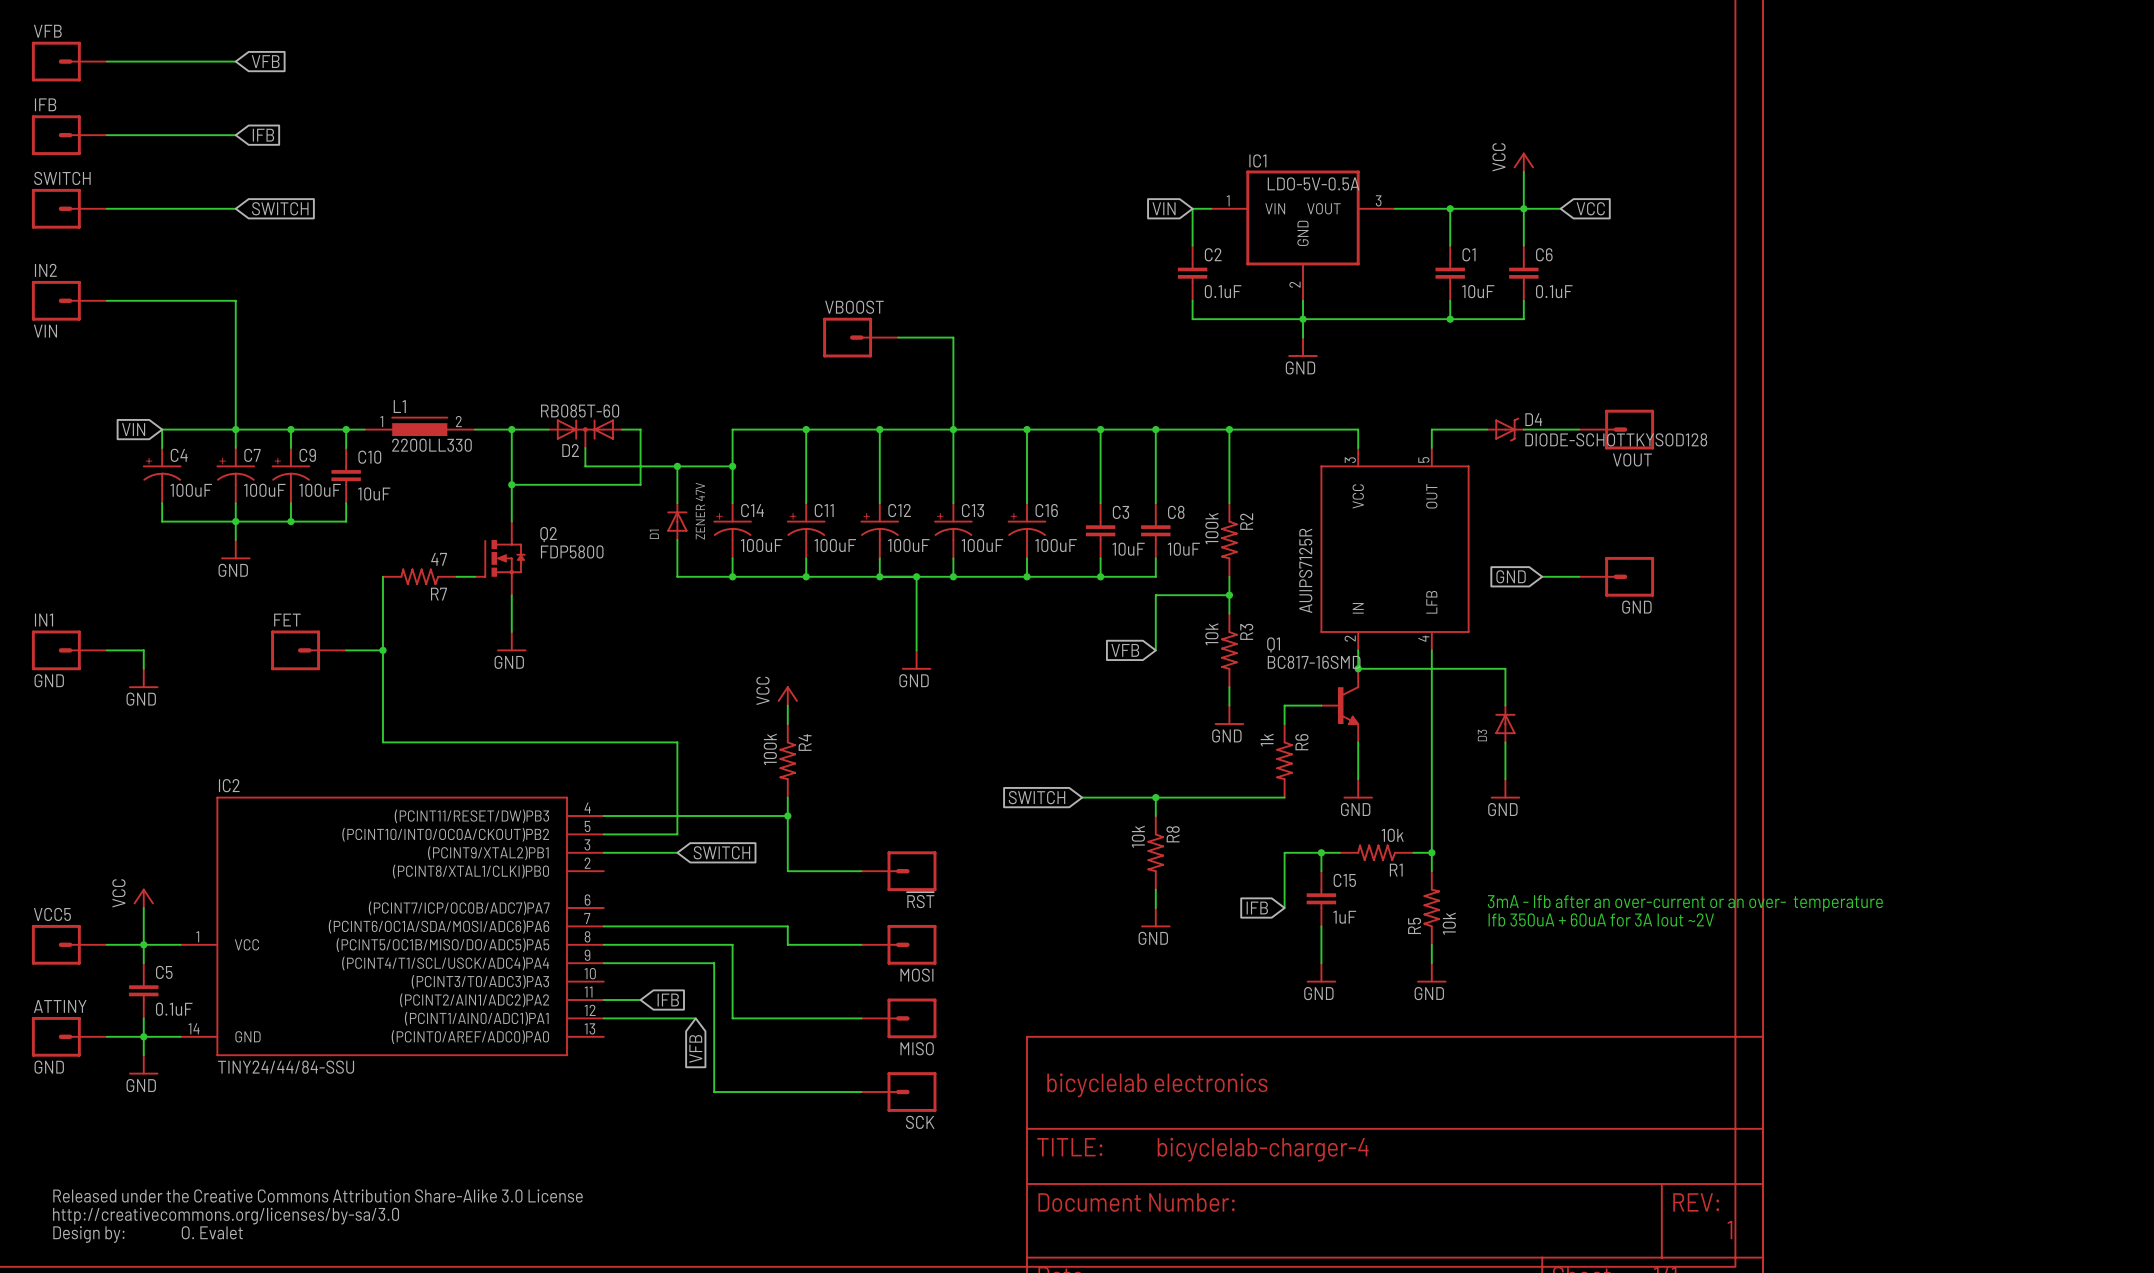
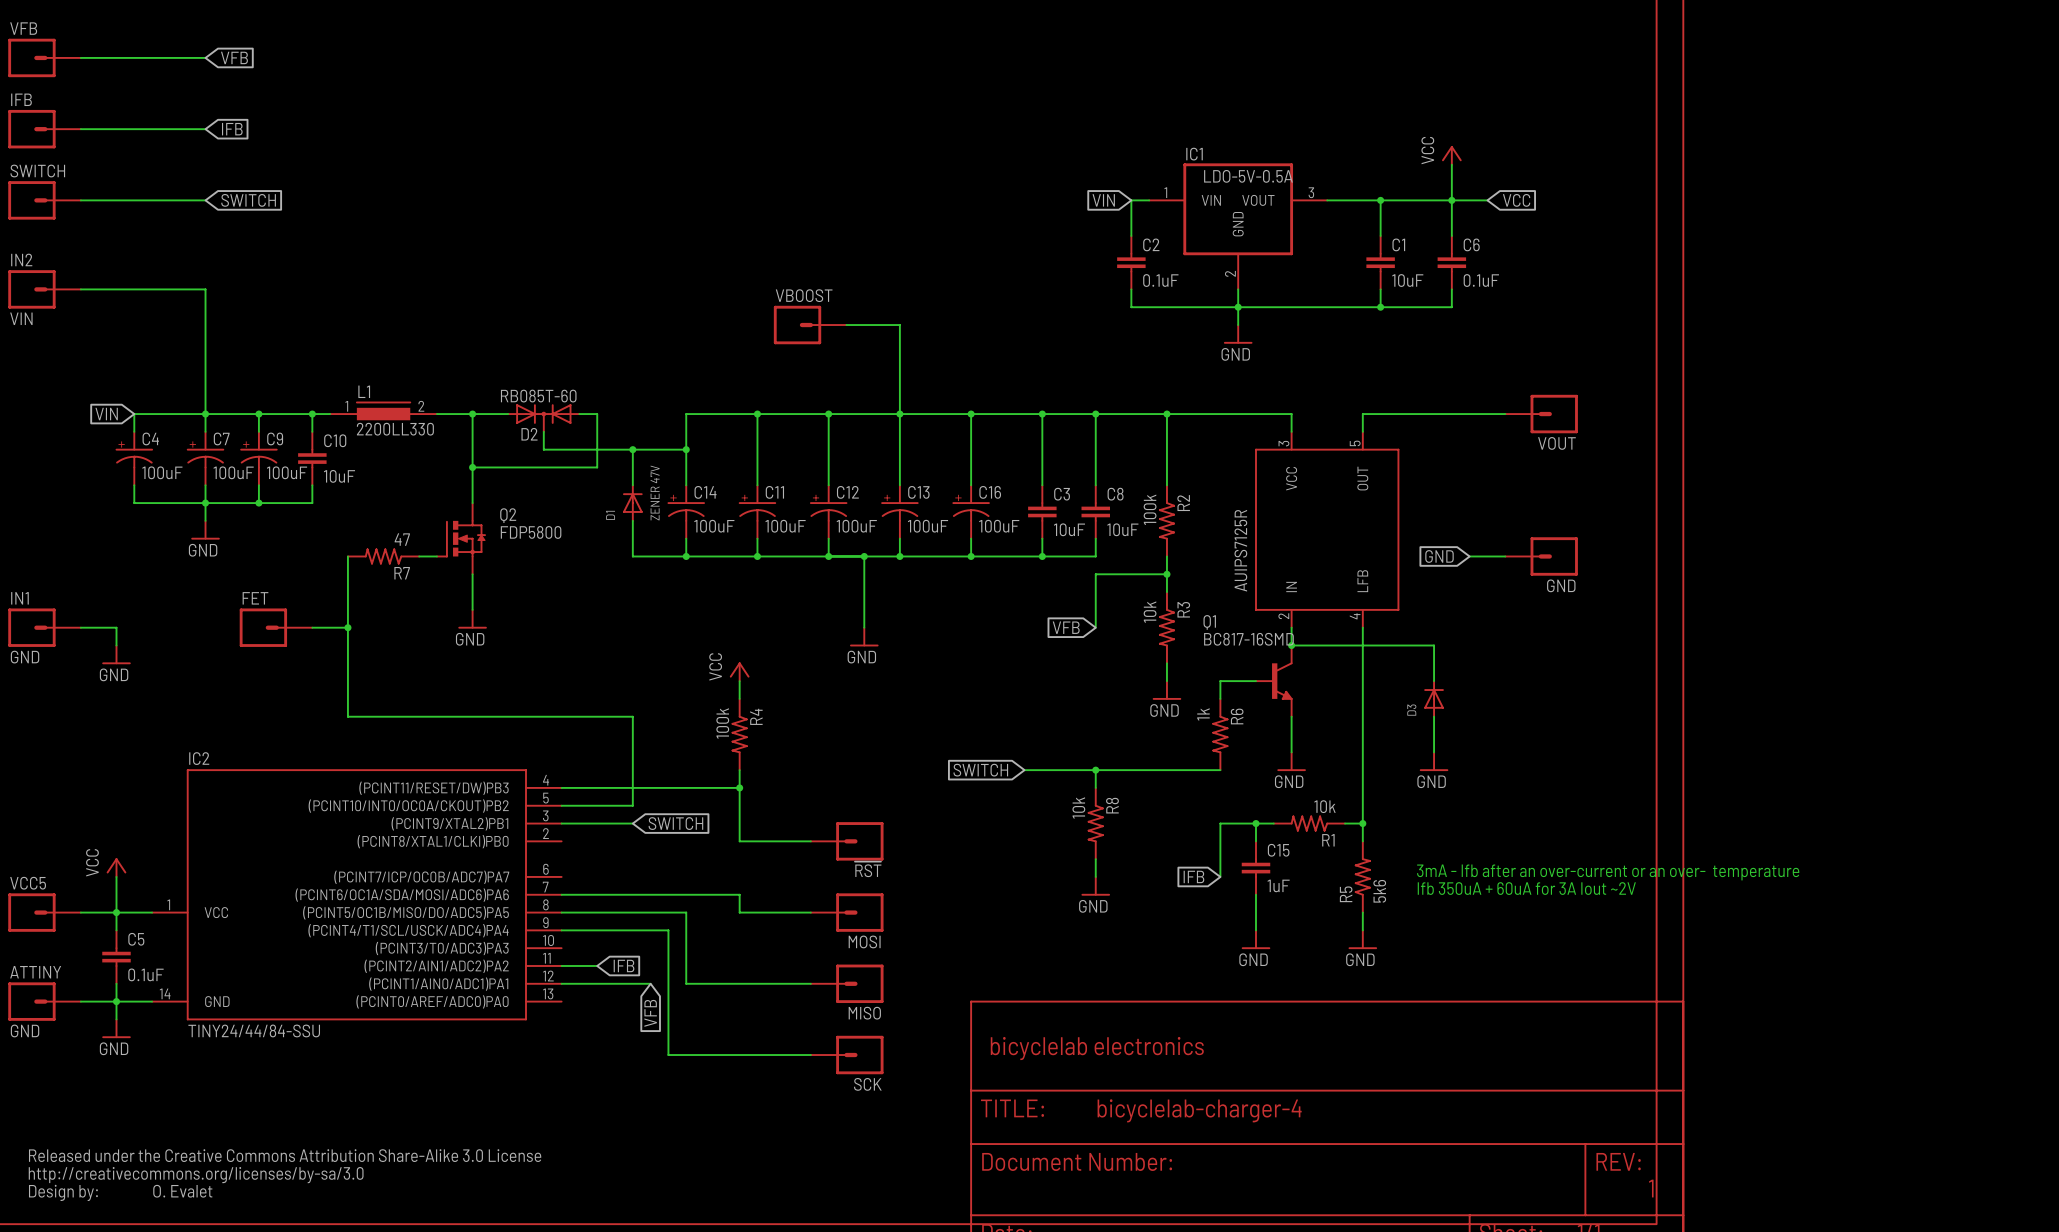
D4: DIODE-SCHOTTKYSOD128 (1505, 429) -> none
R5 value: 10k (1449, 923) -> 5k6 (1379, 891)

